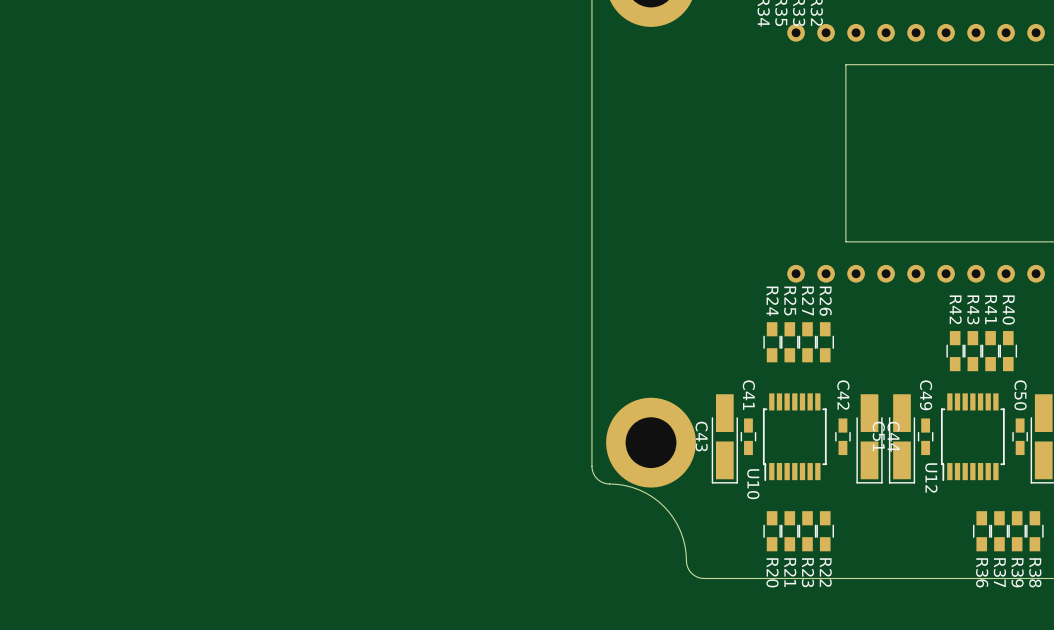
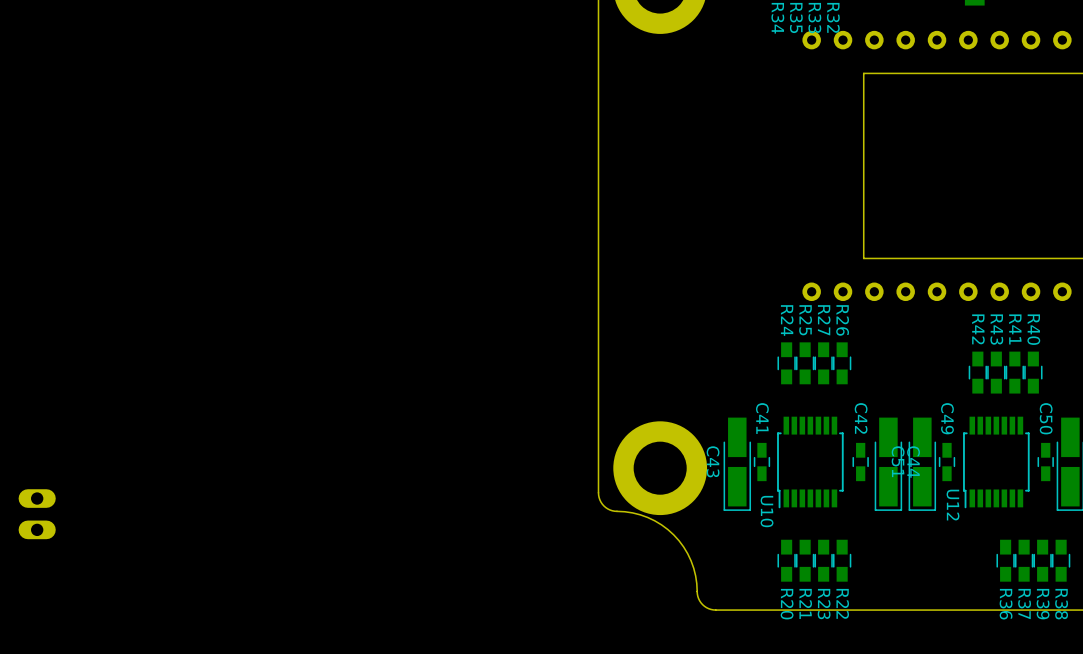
part: none -> (37, 514)

